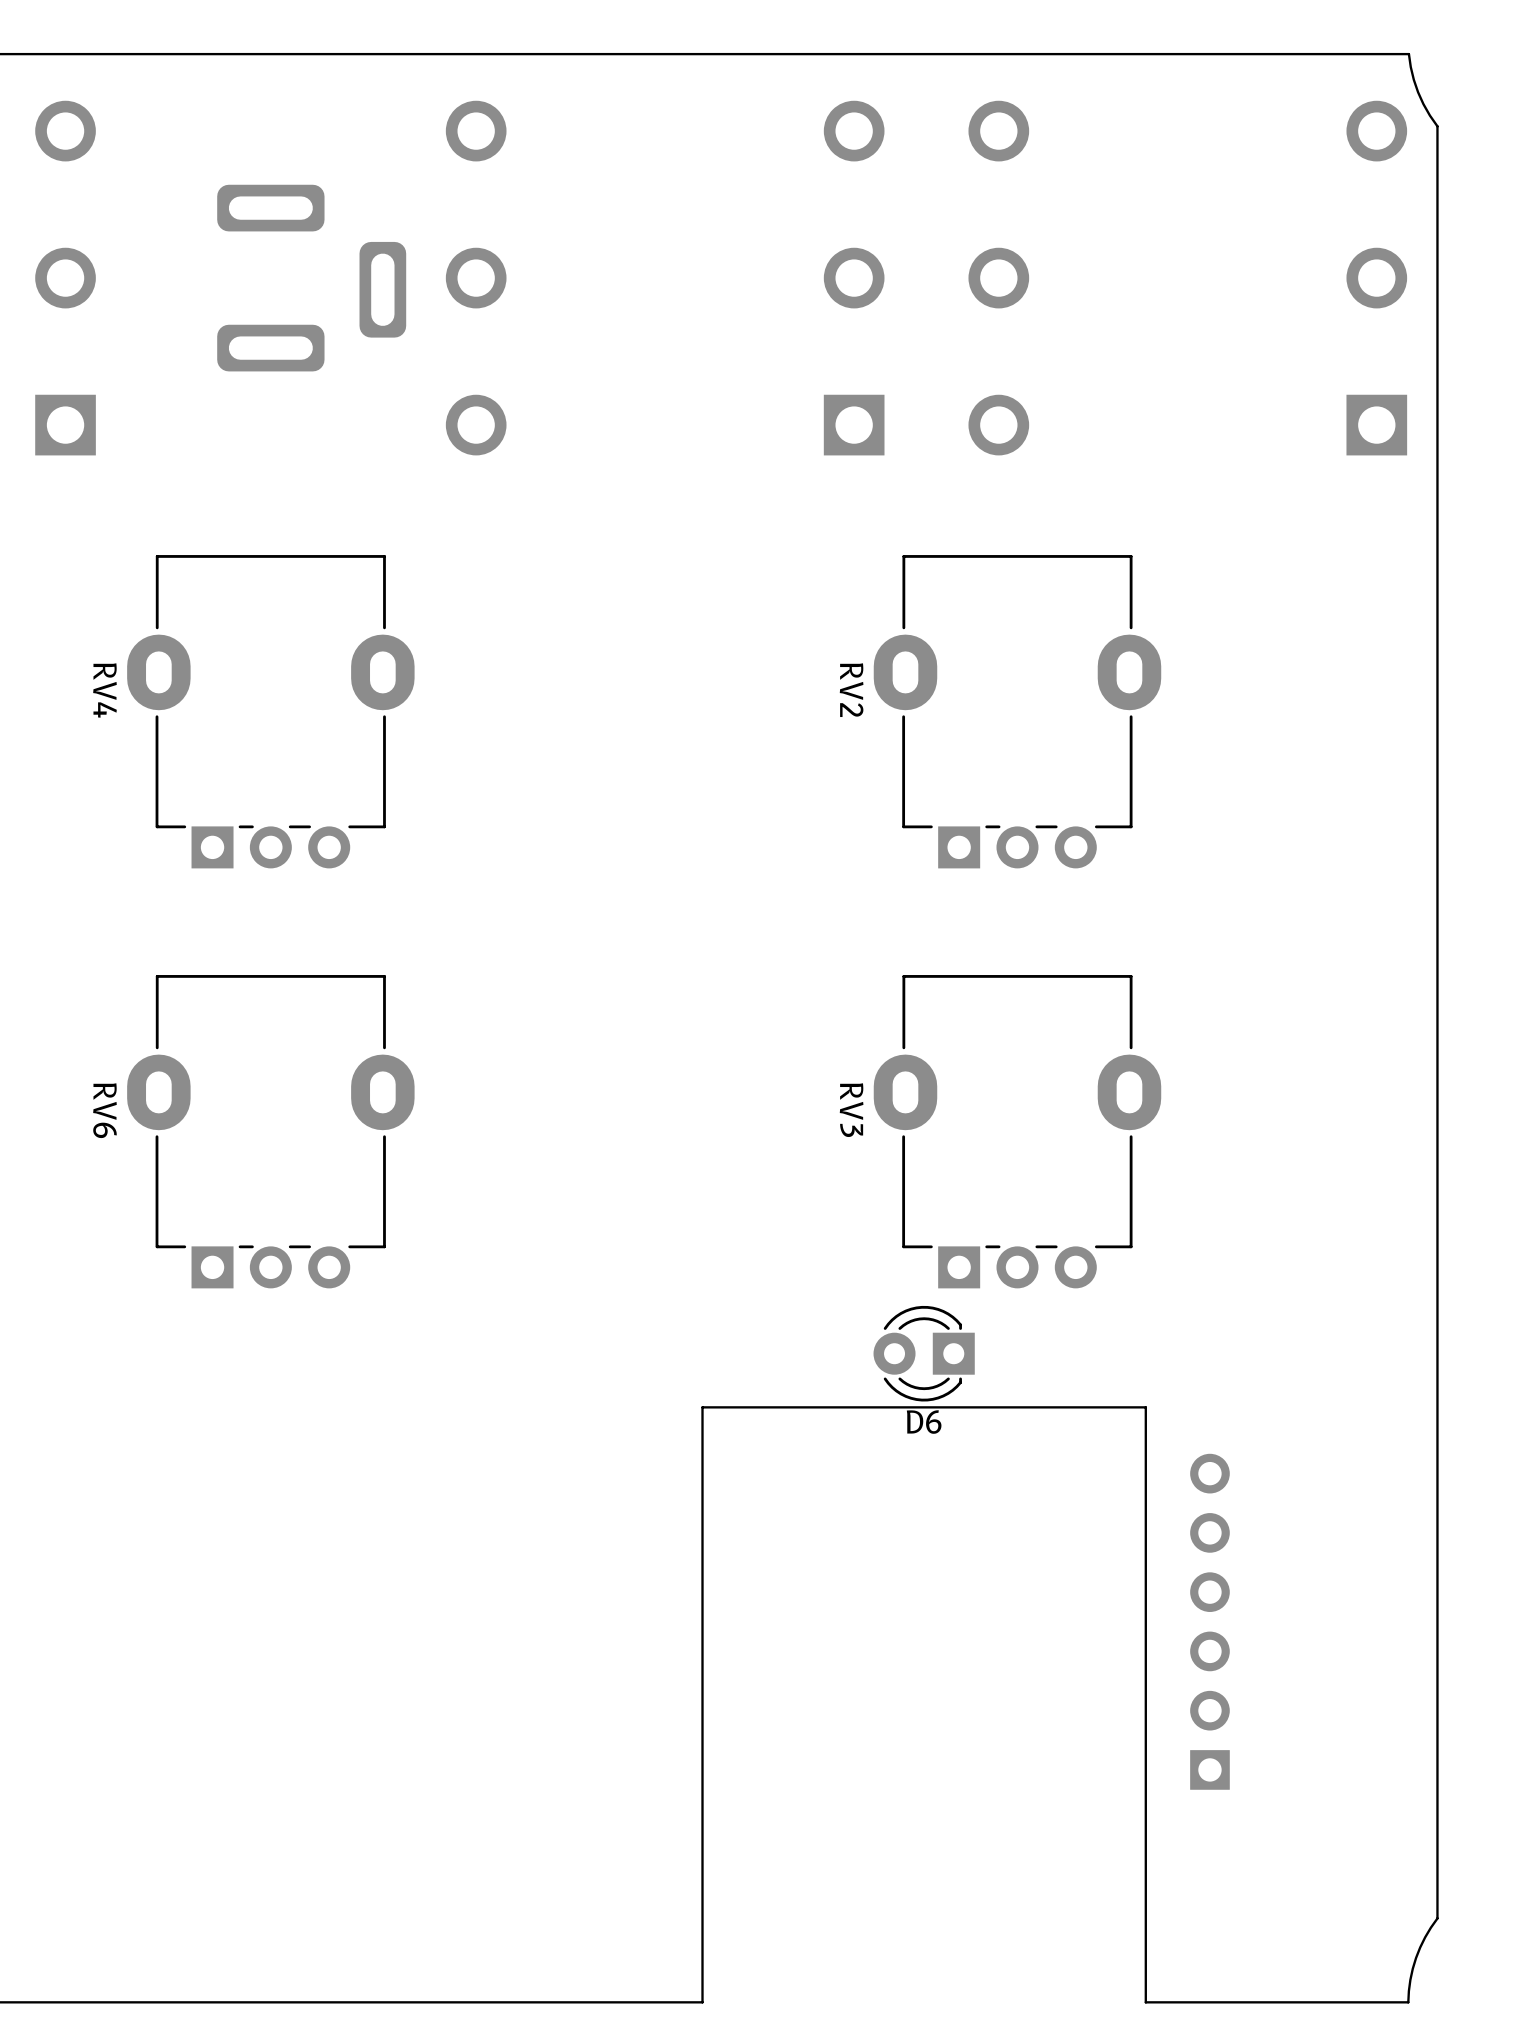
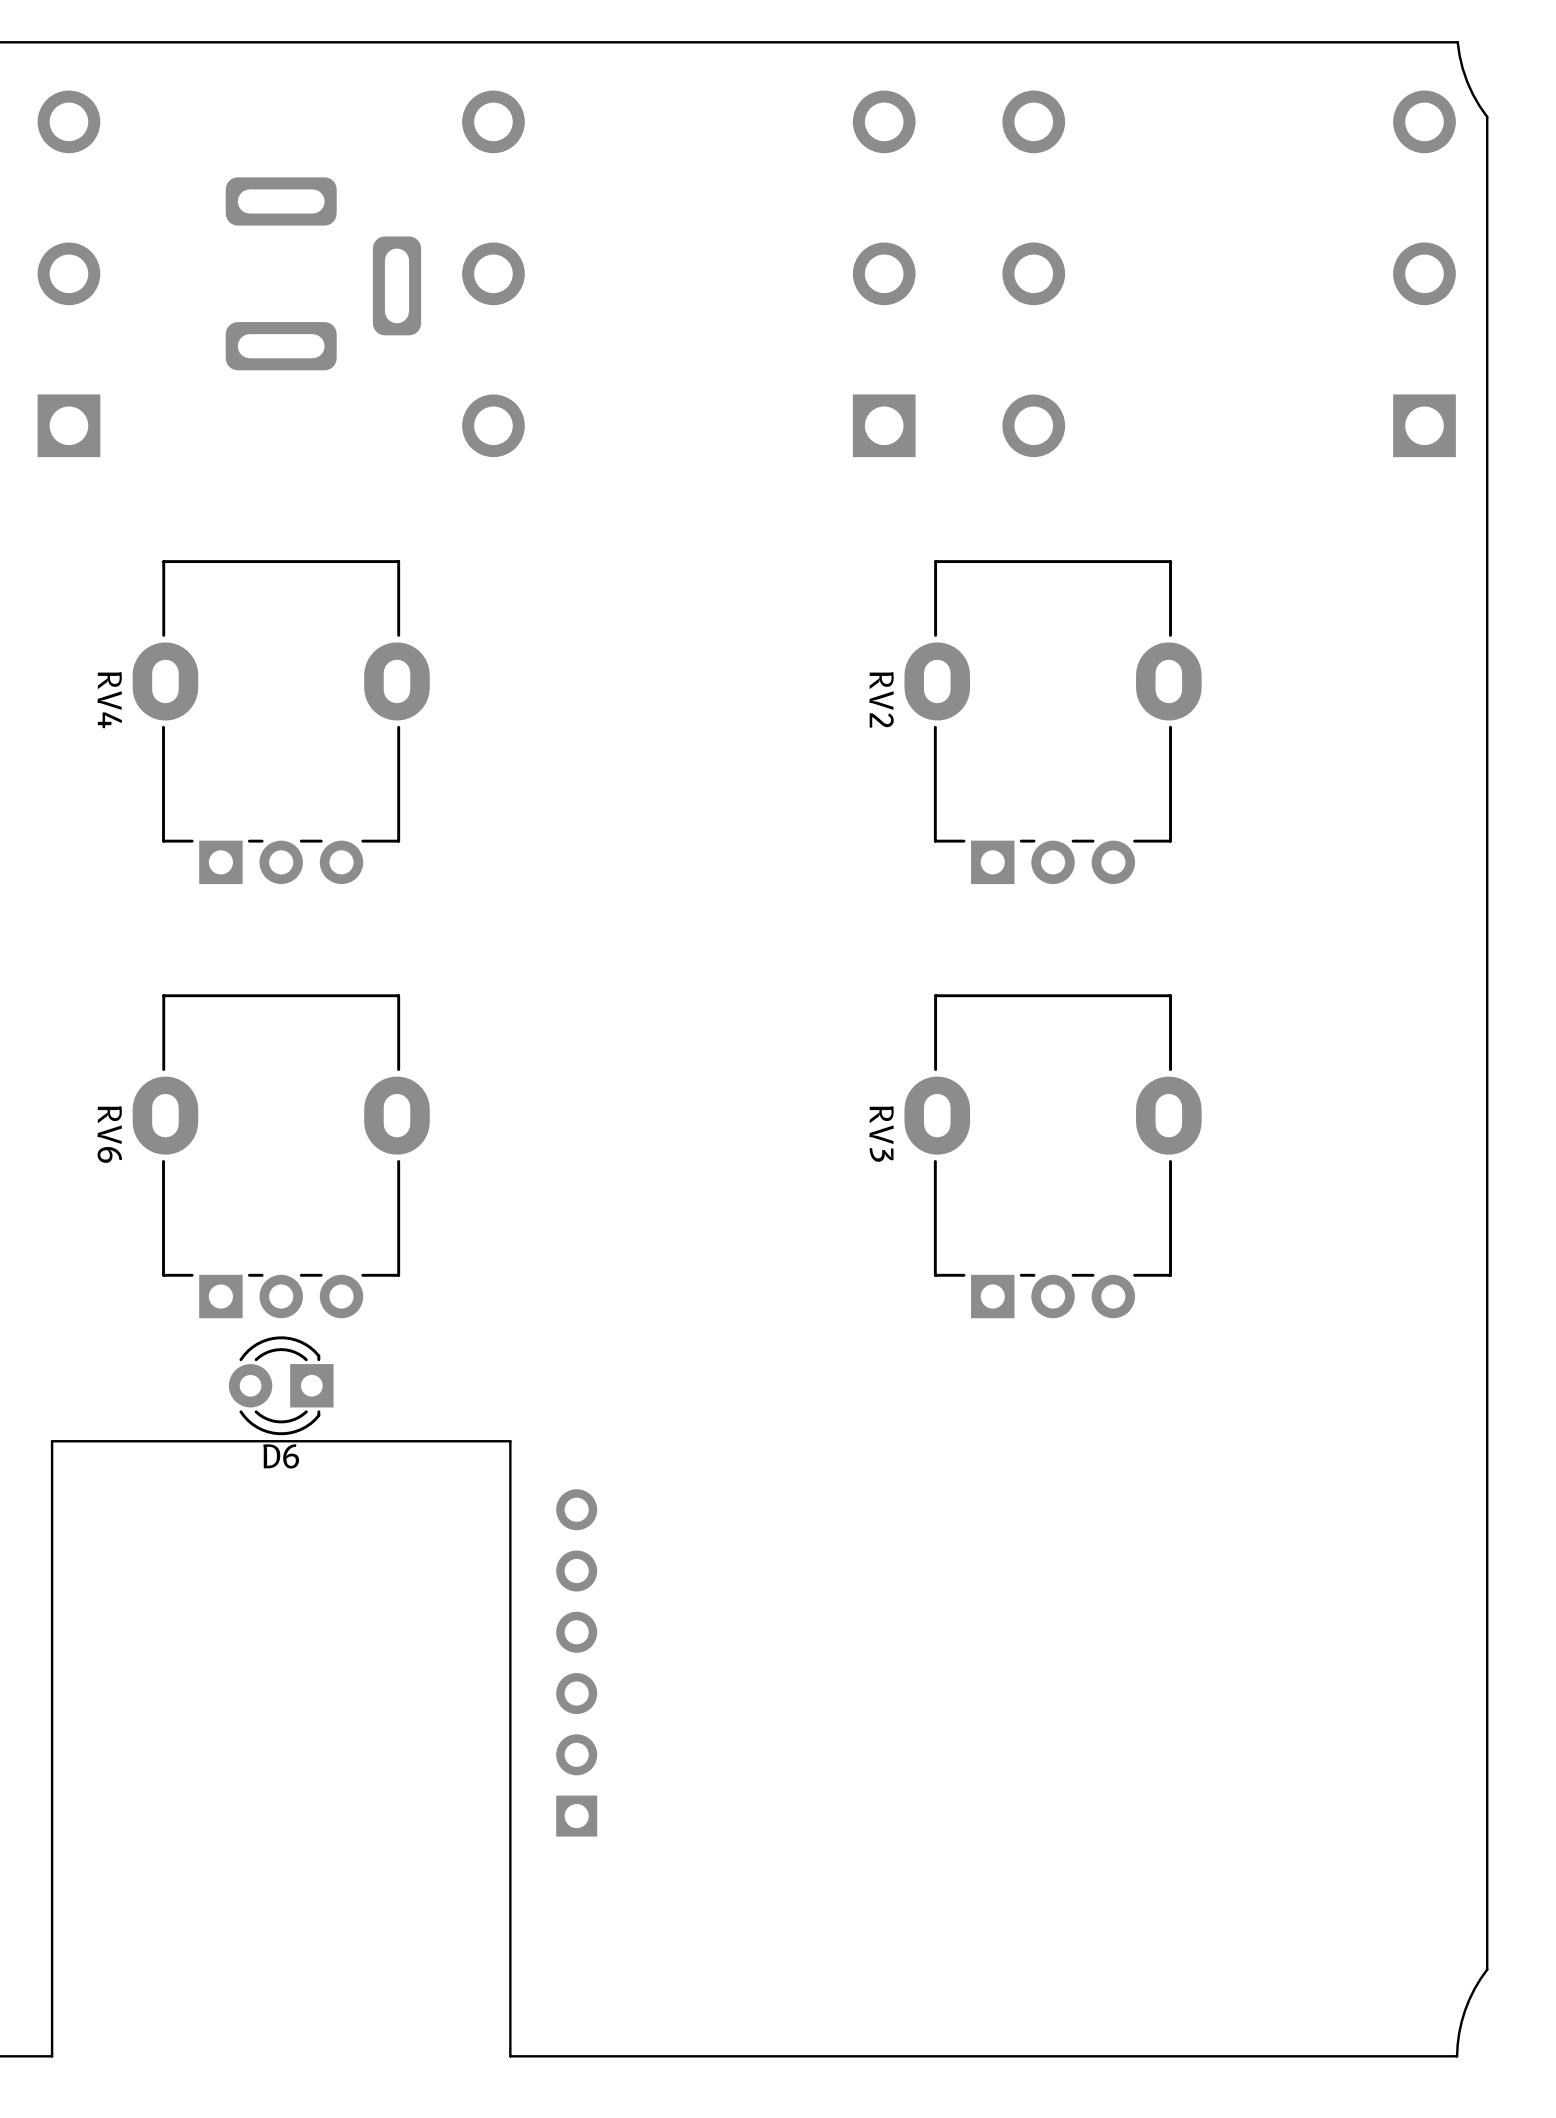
D6 position: (924, 1353) -> (281, 1385)
part: none -> (576, 1662)
part: (1209, 1621) -> none
board edge: (492, 2002) (49, 2002) -> (510, 2056) (510, 1441) (52, 1441) (52, 2056)
board edge: (1145, 2002) (1145, 1407) (702, 1407) (702, 2002) -> (1185, 2056) (727, 2056)

